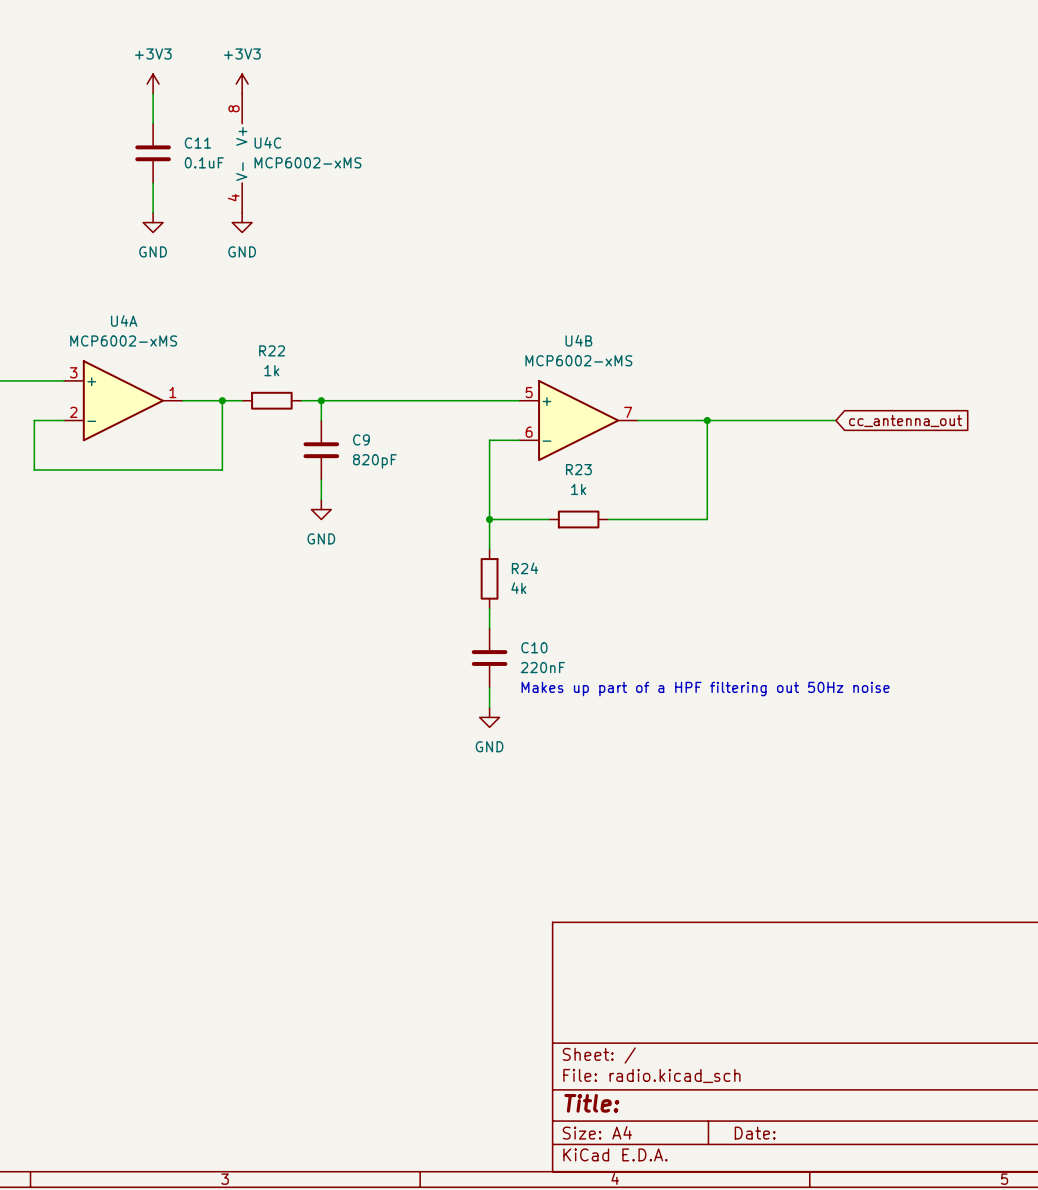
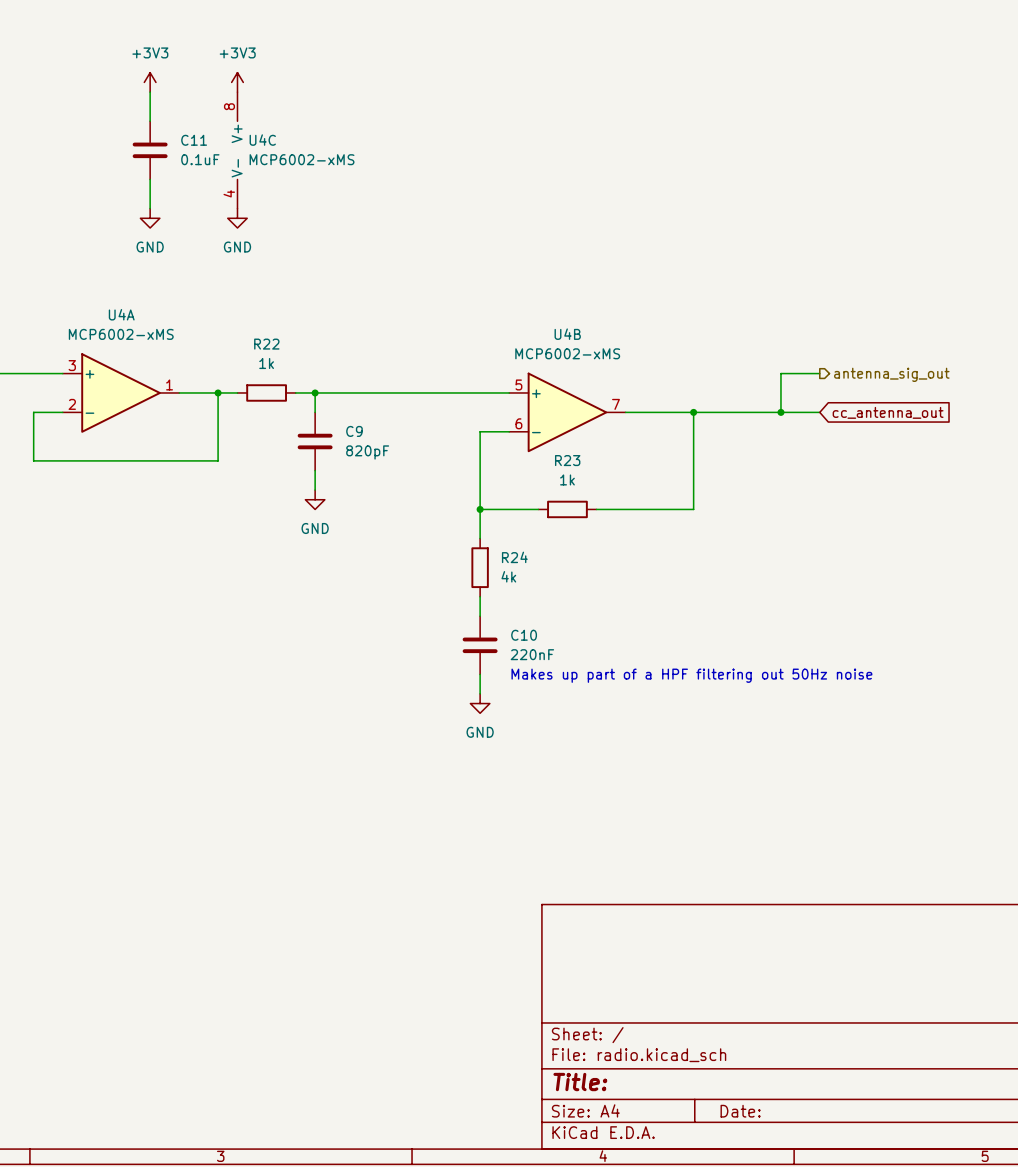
wire: none -> (819, 373) (780, 373) (780, 412)
hierarchical label: none -> antenna_sig_out (891, 374)
junction: none -> (780, 412)

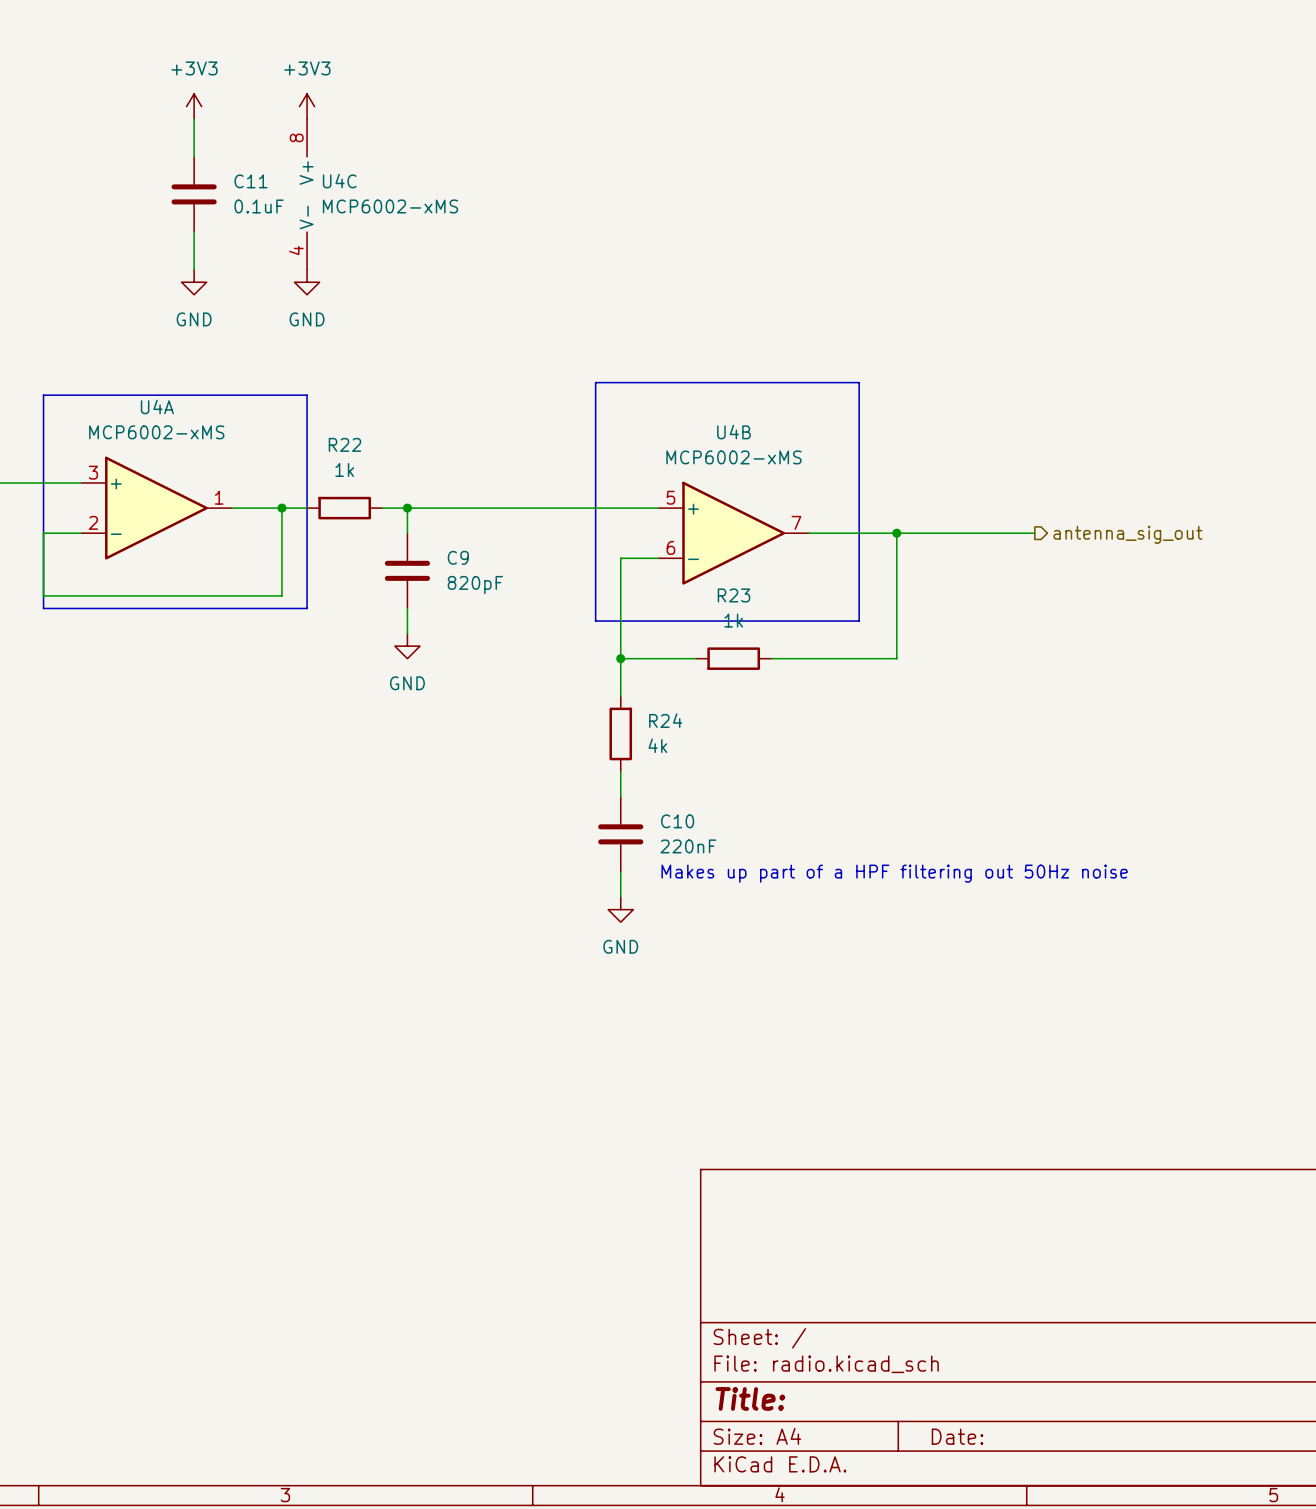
line: none -> (595, 382) (859, 382) (859, 621) (595, 621) (595, 382)
line: none -> (43, 395) (307, 395) (307, 608) (43, 608) (43, 395)
wire: (819, 373) (780, 373) (780, 412) -> none
hierarchical label position: antenna_sig_out (891, 374) -> antenna_sig_out (1127, 534)
junction: (780, 412) -> none
wire: (800, 412) (819, 412) -> none
global label: cc_antenna_out (888, 412) -> none

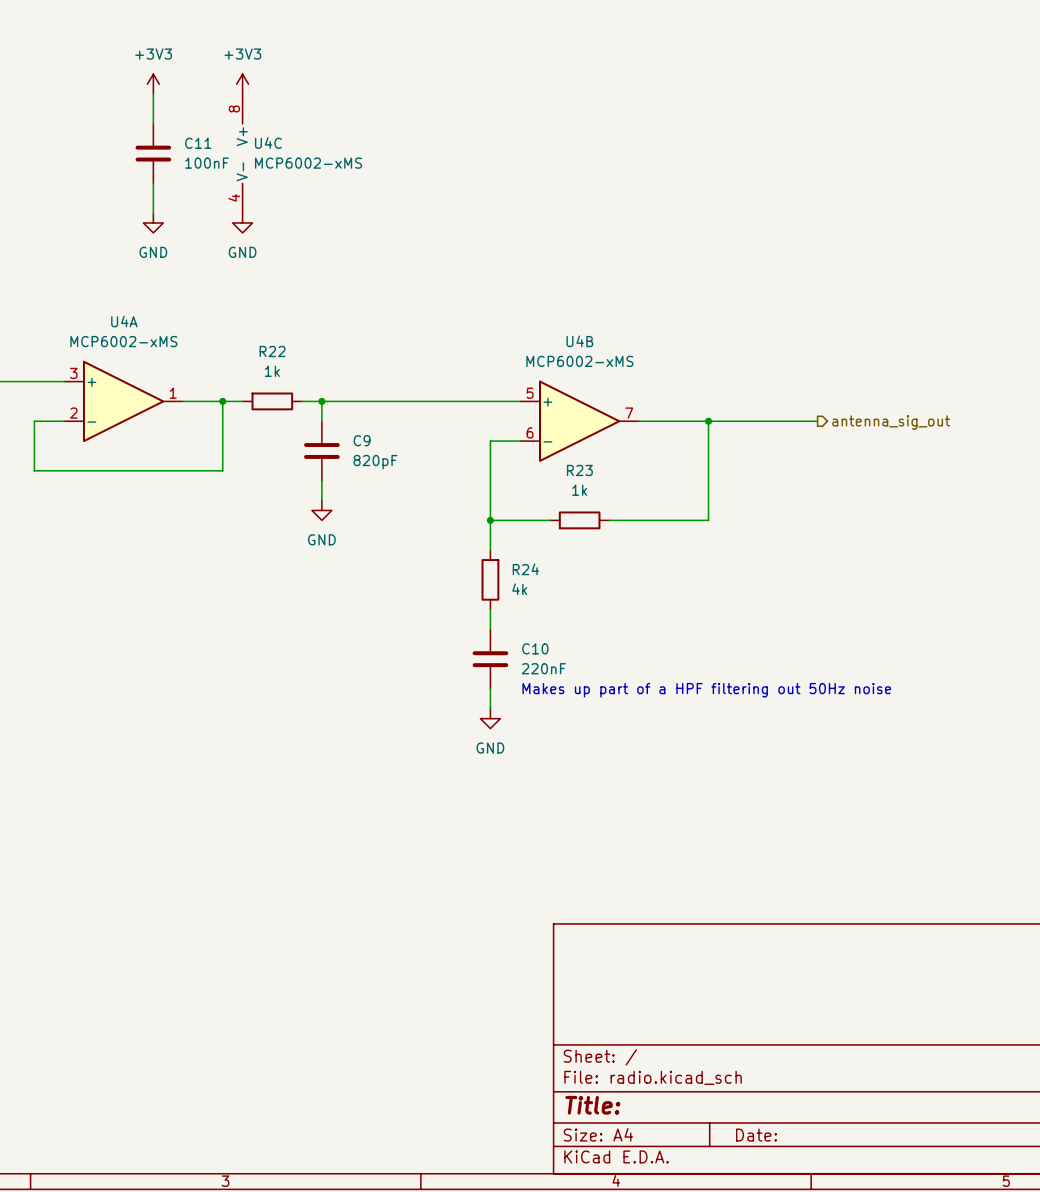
C11 value: 0.1uF (259, 206) -> 100nF (207, 163)
line: (595, 382) (859, 382) (859, 621) (595, 621) (595, 382) -> none
line: (43, 395) (307, 395) (307, 608) (43, 608) (43, 395) -> none

